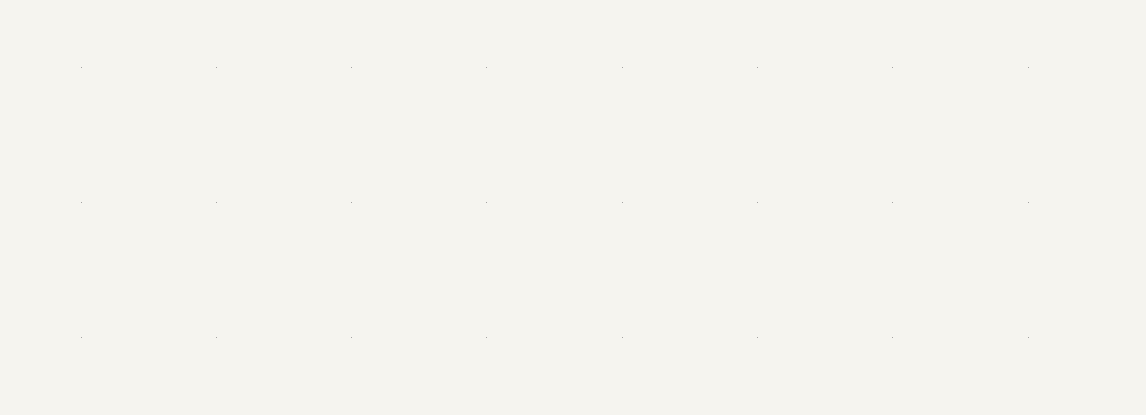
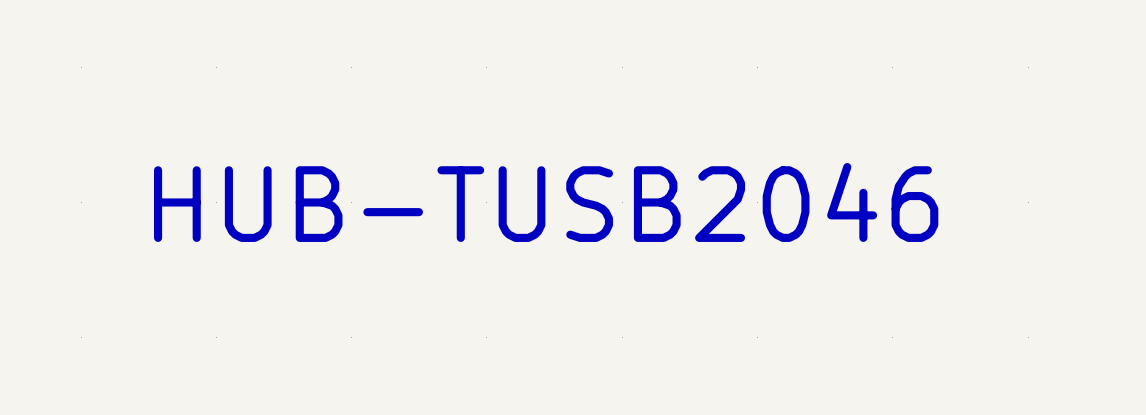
text: none -> HUB-TUSB2046 (546, 202)

